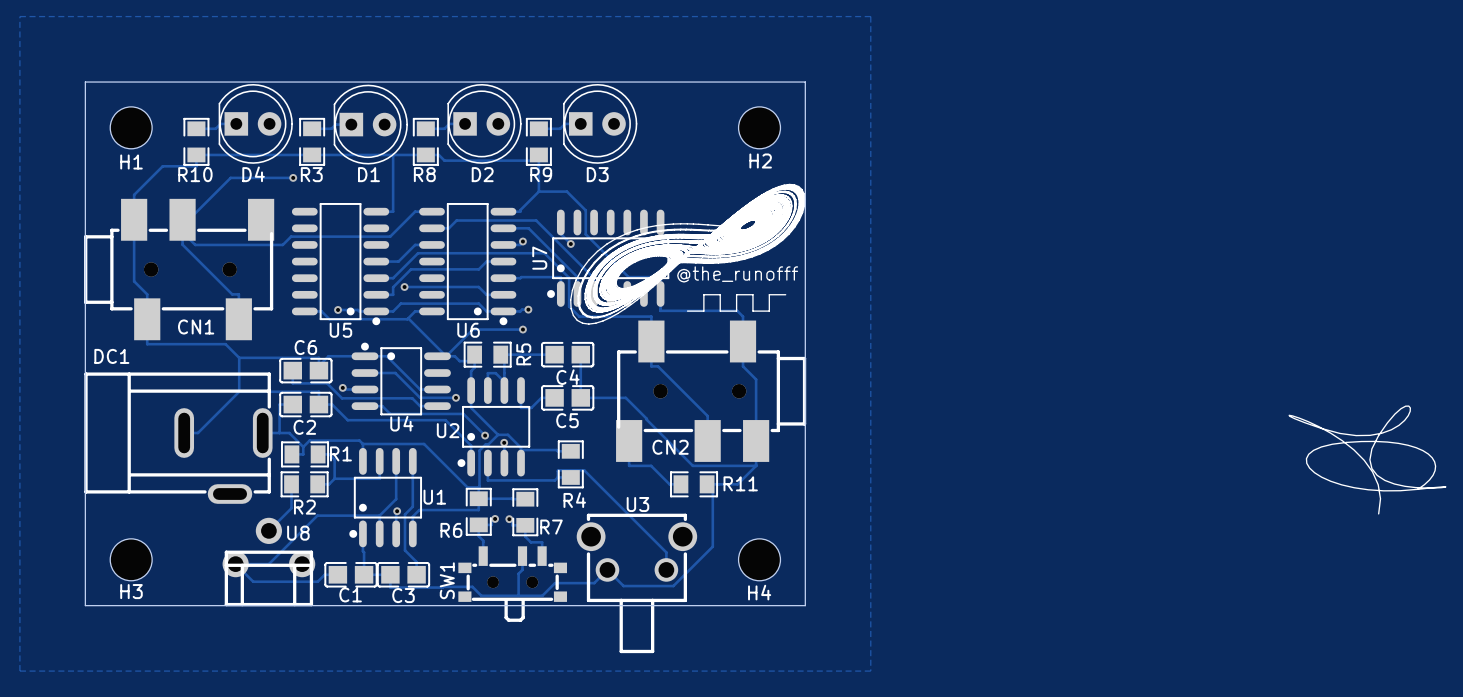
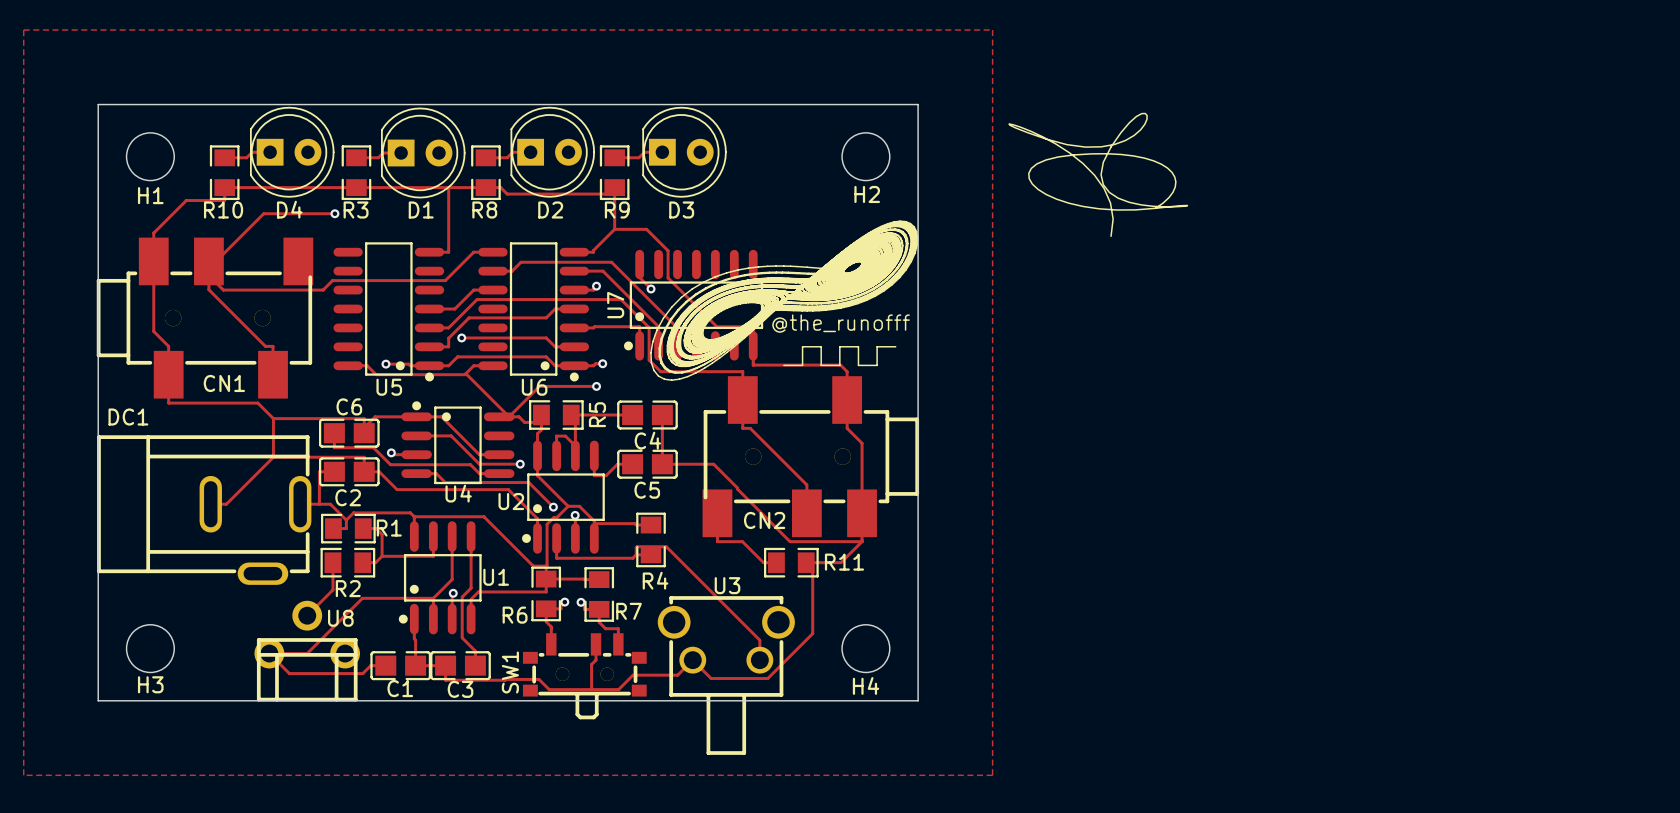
line: none -> (1155, 208) (1116, 210) (1068, 203) (1038, 189) (1029, 178) (1028, 173) (1036, 163) (1058, 156) (1107, 153) (1144, 158) (1167, 168) (1171, 172) (1175, 181) (1172, 192) (1168, 197) (1155, 208)
line: none -> (1155, 208) (1172, 206) (1187, 205) (1153, 206) (1129, 202) (1109, 192) (1103, 184) (1101, 174) (1103, 162) (1111, 146) (1121, 132) (1136, 116) (1145, 113) (1146, 119) (1144, 124) (1134, 135) (1114, 144) (1101, 146) (1067, 144) (1045, 139) (1027, 132) (1009, 124) (1030, 131) (1042, 136) (1056, 144) (1082, 163) (1094, 175) (1104, 188) (1110, 203) (1113, 219) (1111, 236)
line: (1417, 489) (1383, 490) (1341, 484) (1314, 472) (1306, 463) (1306, 458) (1313, 450) (1332, 444) (1375, 441) (1408, 445) (1428, 454) (1435, 466) (1429, 479) (1417, 489) -> none
line: (1417, 489) (1432, 487) (1445, 486) (1415, 487) (1394, 484) (1377, 475) (1371, 468) (1369, 459) (1371, 448) (1378, 435) (1387, 422) (1401, 408) (1408, 406) (1410, 411) (1408, 415) (1398, 425) (1381, 433) (1370, 435) (1339, 433) (1321, 428) (1305, 422) (1289, 415) (1308, 421) (1318, 426) (1330, 433) (1353, 449) (1364, 460) (1378, 484) (1380, 498) (1378, 513) -> none

